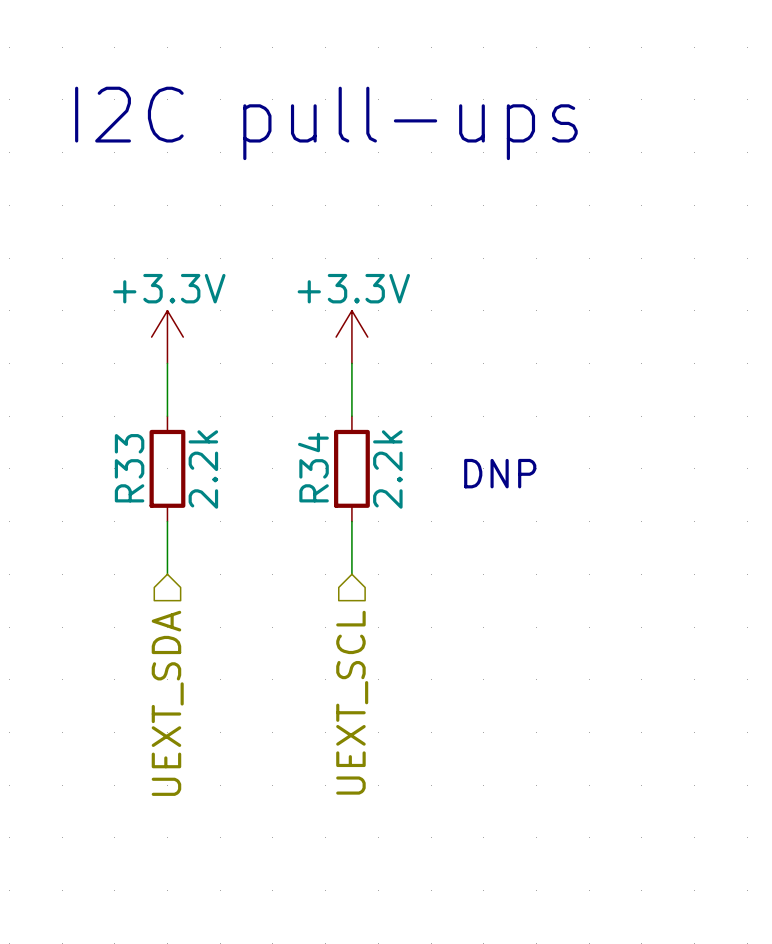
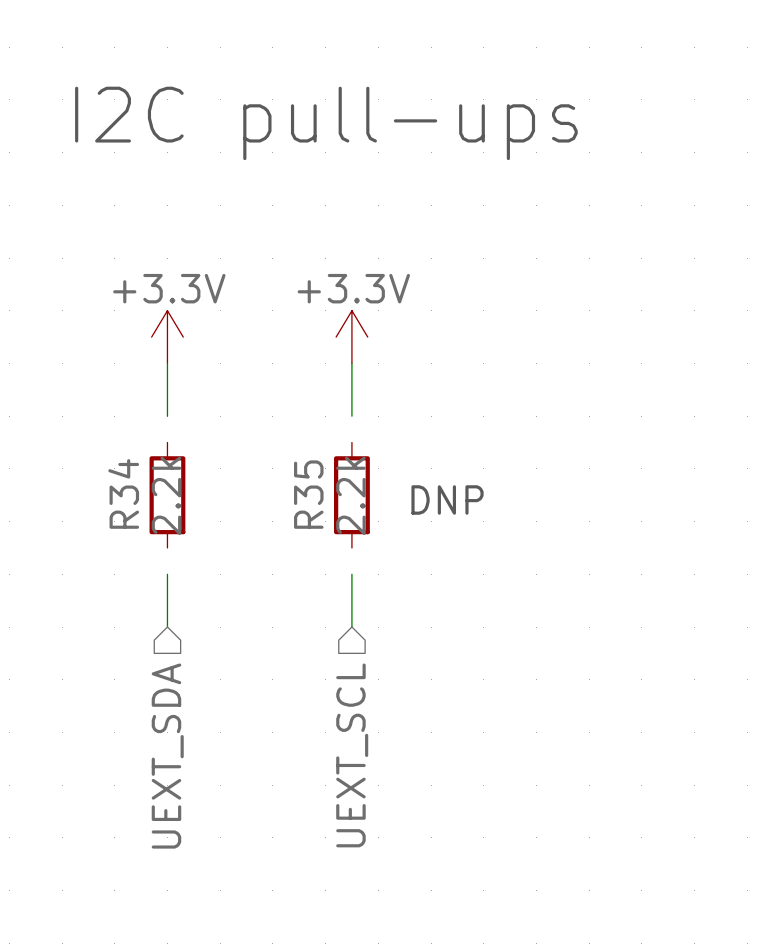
R34 name position: R34 (313, 467) -> R34 (123, 493)
R33: 2.2k (167, 468) -> none
R34 position: (351, 468) -> (167, 495)
R34 value position: 2.2k (387, 469) -> 2.2k (166, 495)
text position: DNP (500, 473) -> DNP (447, 499)
R35: none -> 2.2k (351, 495)
wire: (167, 521) (167, 574) -> (167, 627) (167, 574)
wire: (351, 521) (351, 574) -> (351, 627) (351, 574)
hierarchical label position: UEXT_SCL (352, 702) -> UEXT_SCL (352, 755)
hierarchical label position: UEXT_SDA (167, 703) -> UEXT_SDA (167, 756)

